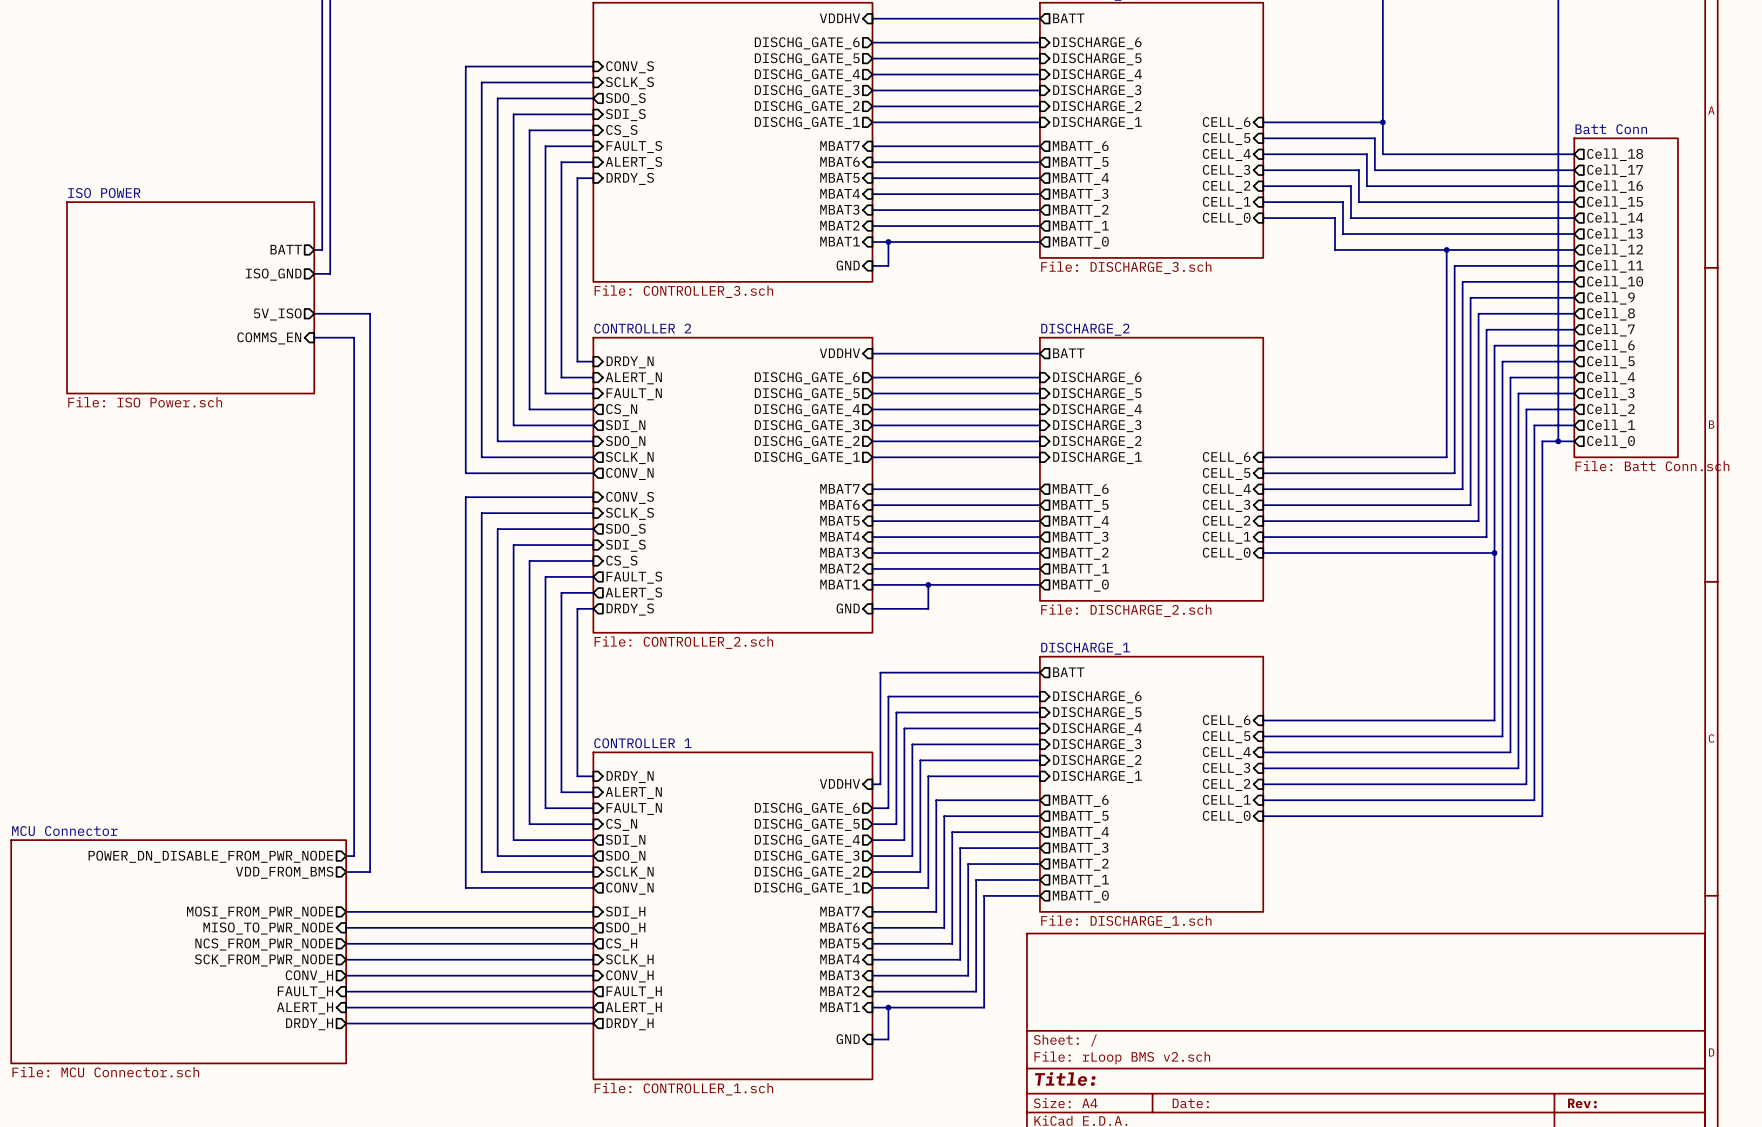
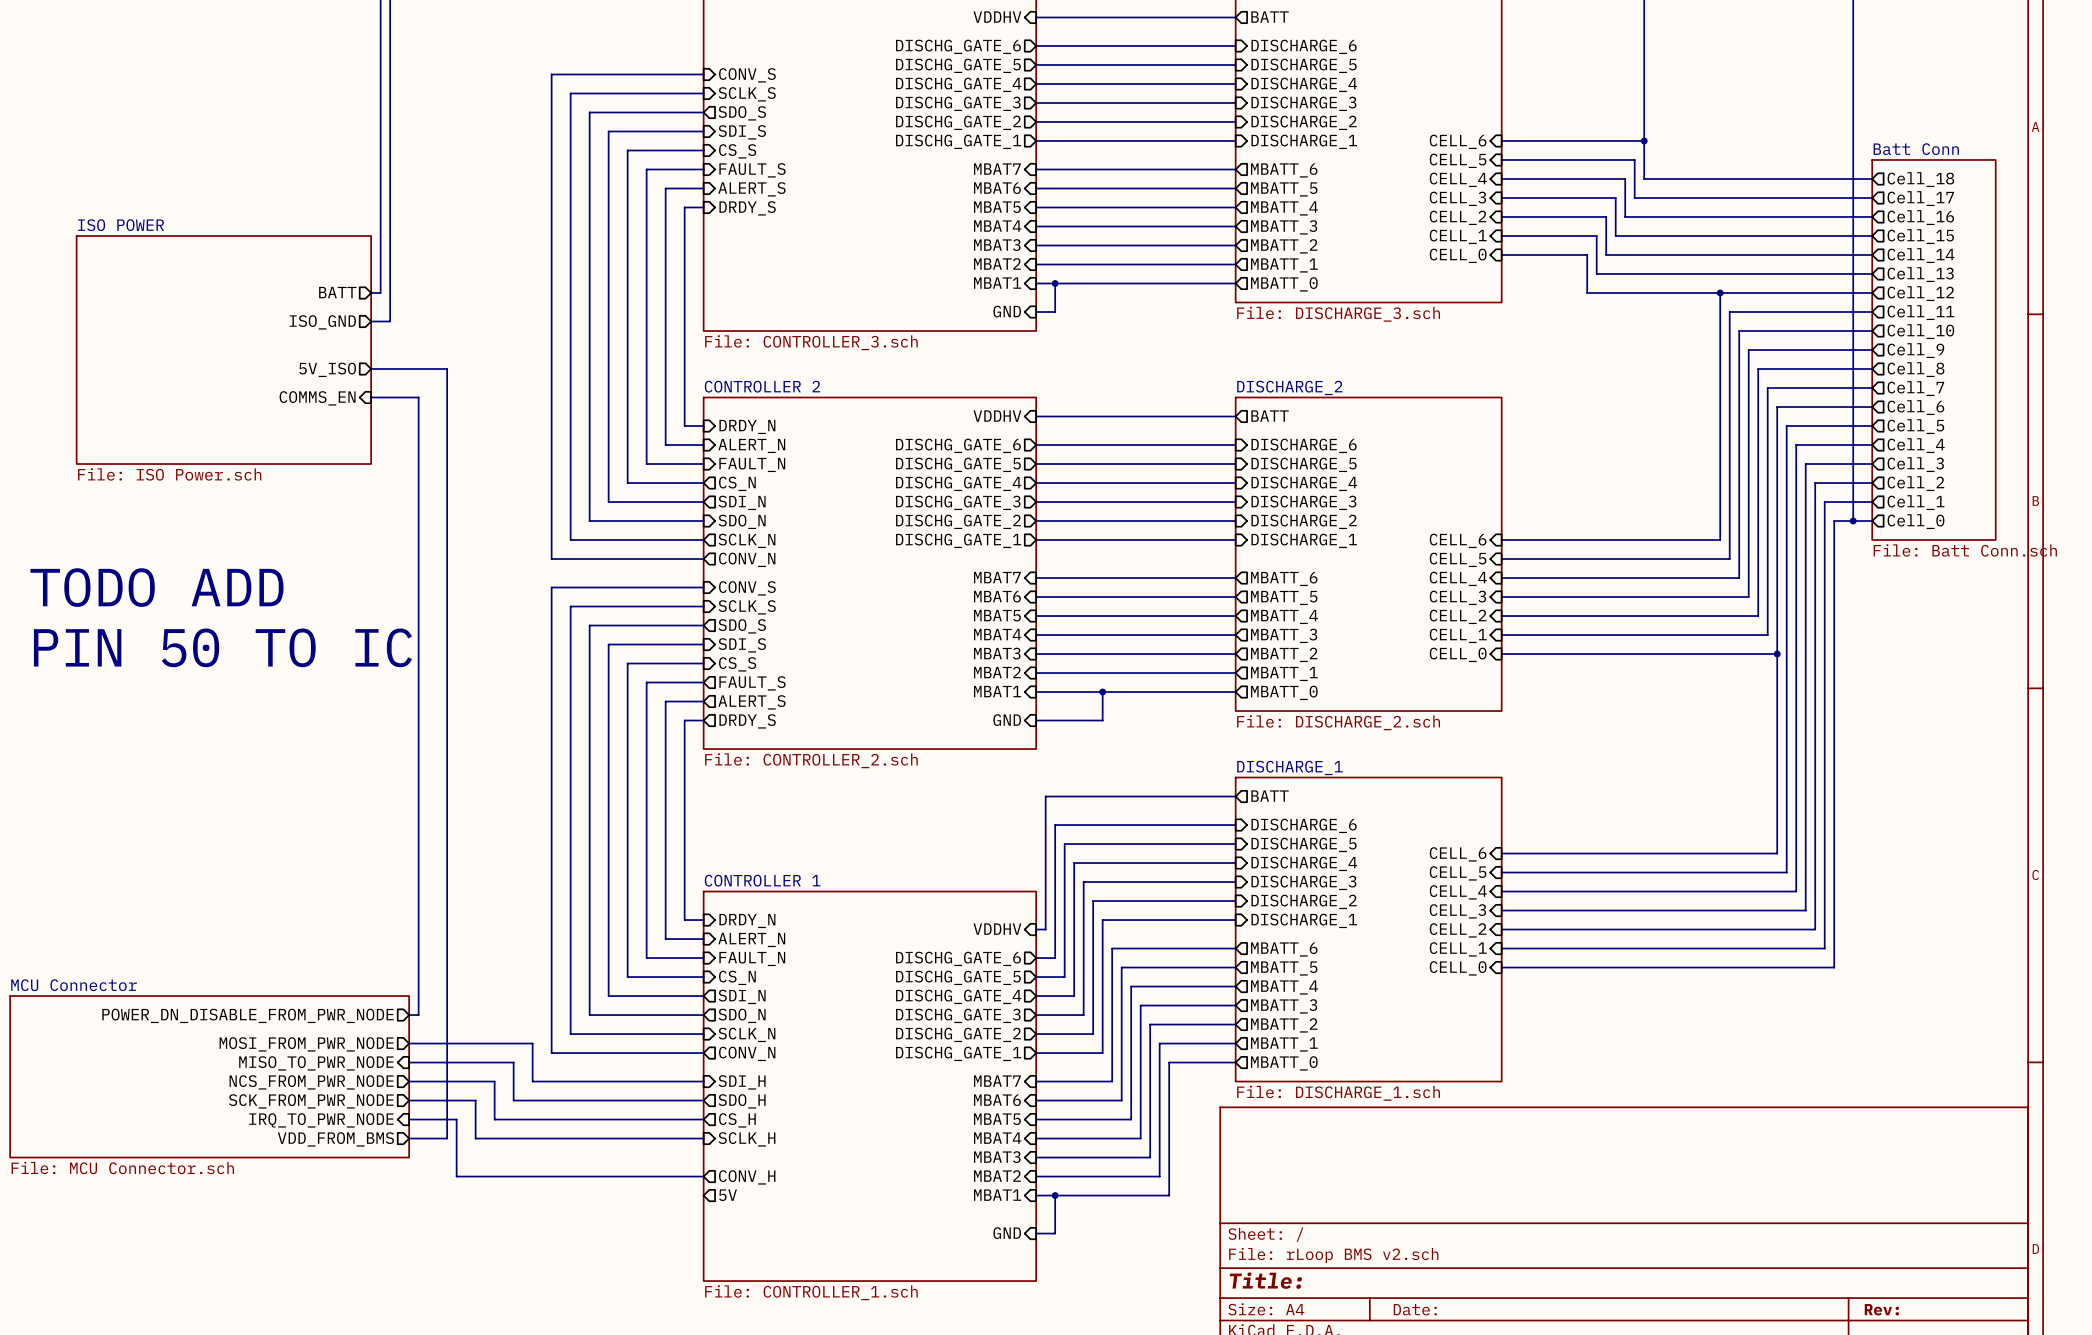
wire: (370, 313) (370, 872) (346, 872) -> (437, 369) (447, 369) (447, 1138)
text: none -> TODO ADD (156, 587)
text: none -> PIN 50 TO IC (222, 647)
sheet pin: VDD_FROM_BMS (284, 872) -> none
wire: none -> (409, 1043) (532, 1043) (532, 1081)
sheet pin: none -> MOSI_FROM_PWR_NODE (306, 1044)
sheet pin: none -> MISO_TO_PWR_NODE (316, 1063)
sheet MCU Connector: none -> File: MCU Connector.sch (209, 1076)
wire: (417, 911) (449, 911) -> (494, 1081) (494, 1119)
sheet pin: MOSI_FROM_PWR_NODE (260, 912) -> NCS_FROM_PWR_NODE (311, 1082)
wire: (401, 927) (433, 927) -> (409, 1062) (513, 1062) (513, 1100)
sheet pin shape: input (268, 928) -> output (311, 1101)
sheet pin: MISO_TO_PWR_NODE (268, 928) -> SCK_FROM_PWR_NODE (311, 1101)
wire: (386, 943) (417, 943) -> (456, 1119) (456, 1176)
sheet pin shape: output (264, 944) -> input (321, 1120)
sheet pin: NCS_FROM_PWR_NODE (264, 944) -> IRQ_TO_PWR_NODE (321, 1120)
sheet MCU Connector: File: MCU Connector.sch (178, 951) -> none
wire: (378, 959) (401, 959) -> (475, 1100) (475, 1138)
sheet pin: SCK_FROM_PWR_NODE (264, 960) -> VDD_FROM_BMS (335, 1139)
wire: (346, 975) (593, 975) -> none
sheet pin: CONV_H (309, 976) -> none
sheet pin: CONV_H (629, 976) -> none
wire: (346, 991) (386, 991) -> none
sheet pin: FAULT_H (305, 992) -> none
sheet pin: FAULT_H (634, 992) -> CONV_H (747, 1177)
wire: (346, 1007) (593, 1007) -> none
sheet pin: ALERT_H (305, 1008) -> none
sheet pin: ALERT_H (633, 1008) -> 5V (728, 1195)
wire: (346, 1023) (593, 1023) -> none
sheet pin: DRDY_H (309, 1024) -> none
sheet pin: DRDY_H (630, 1024) -> none

